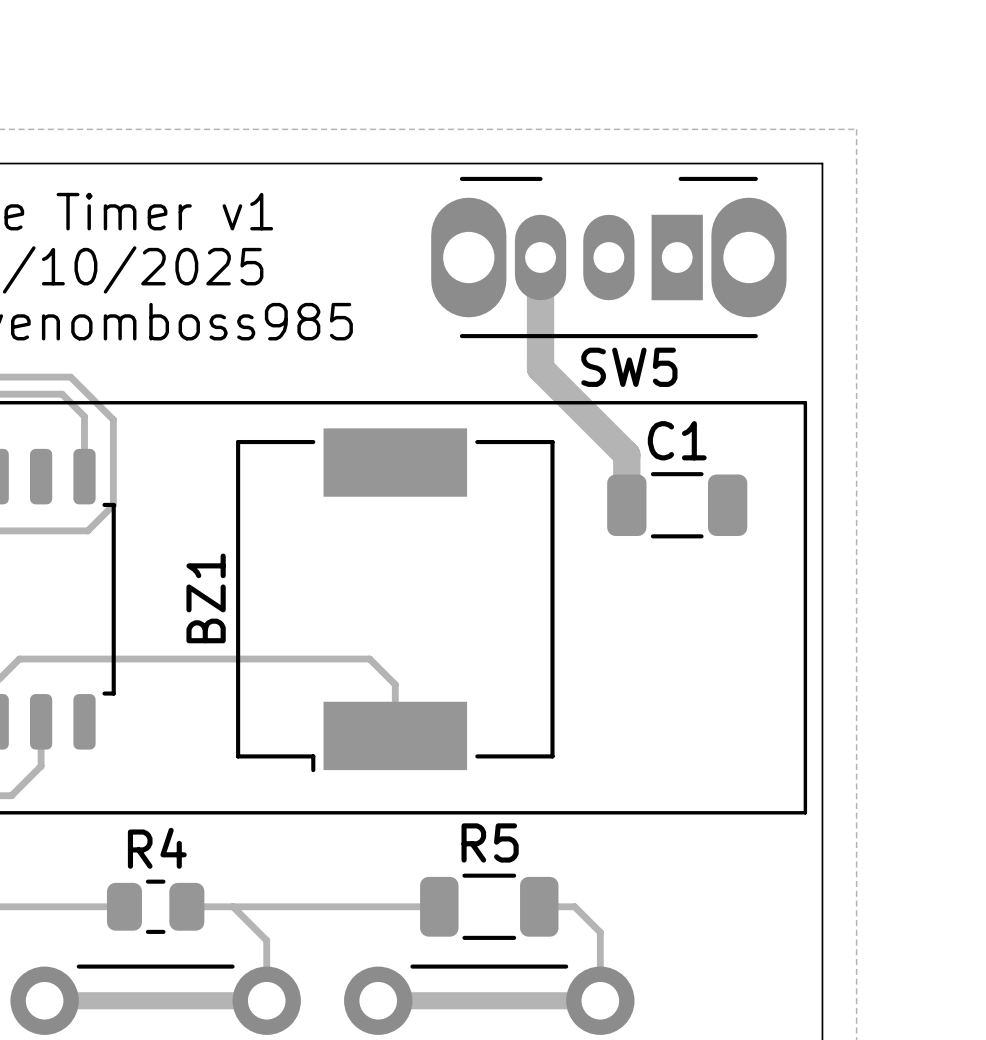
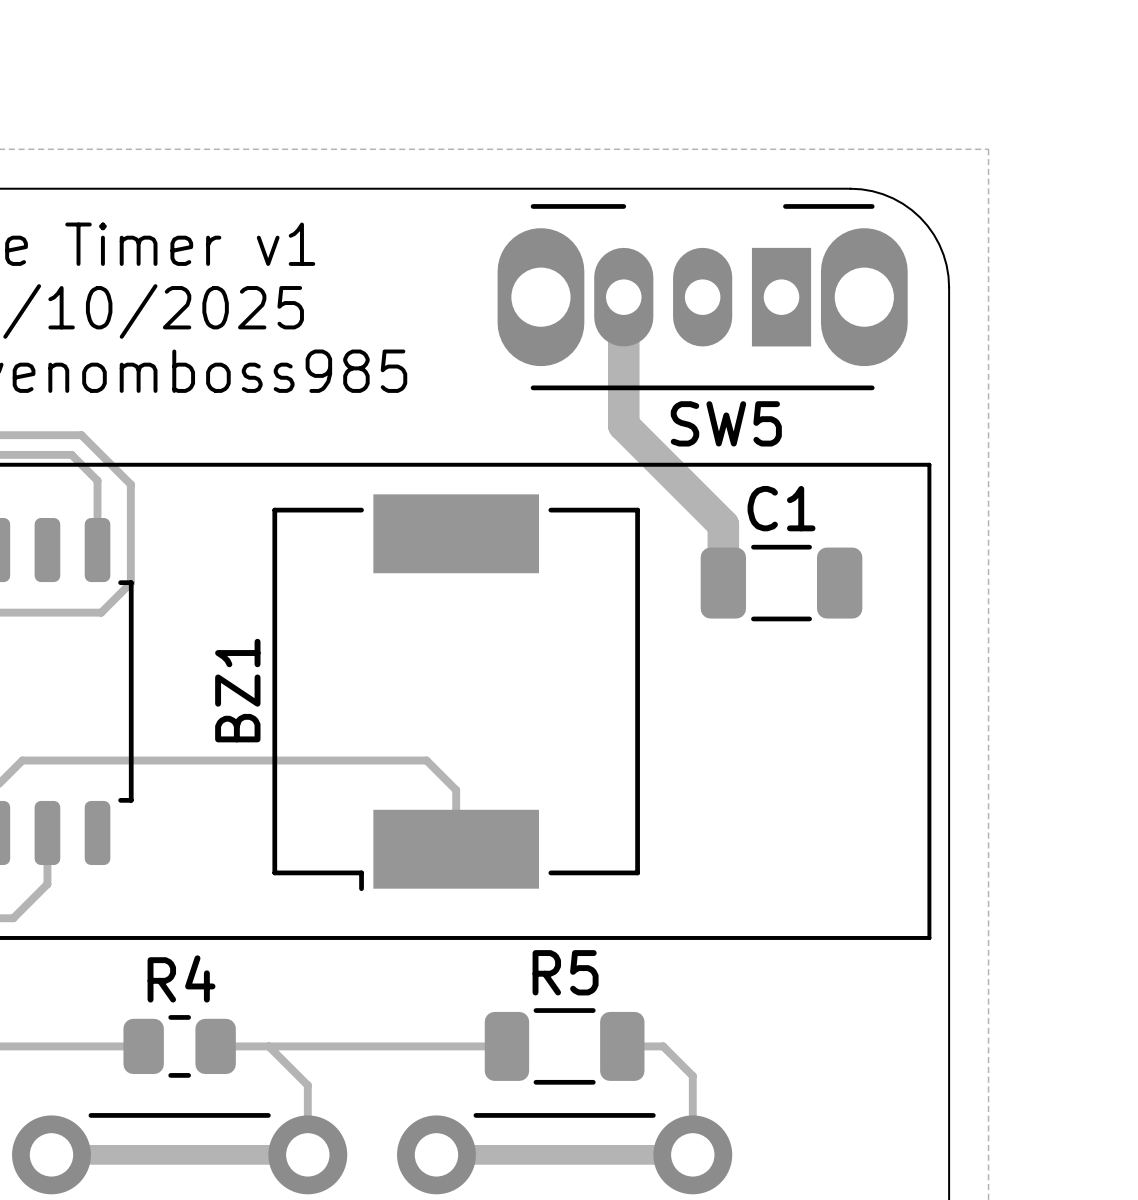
board edge: (737, 163) (822, 163) (822, 248) -> (850, 188) (883, 194) (902, 203) (920, 217) (934, 234) (943, 254) (949, 287)

